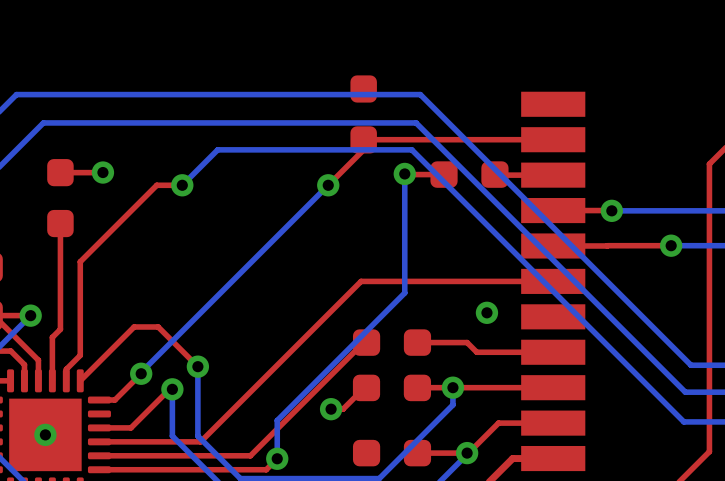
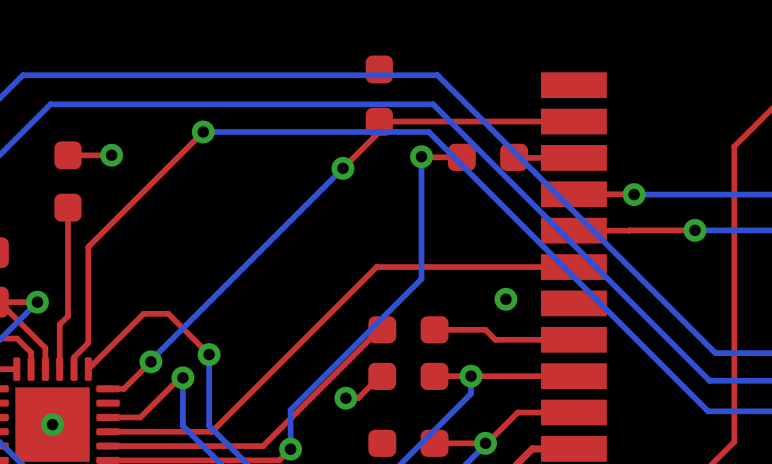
bottom track: (217, 149) (182, 185) -> (229, 131) (203, 131)
top track: (182, 185) (156, 185) -> (203, 131) (166, 168)
via position: (182, 185) -> (203, 131)

